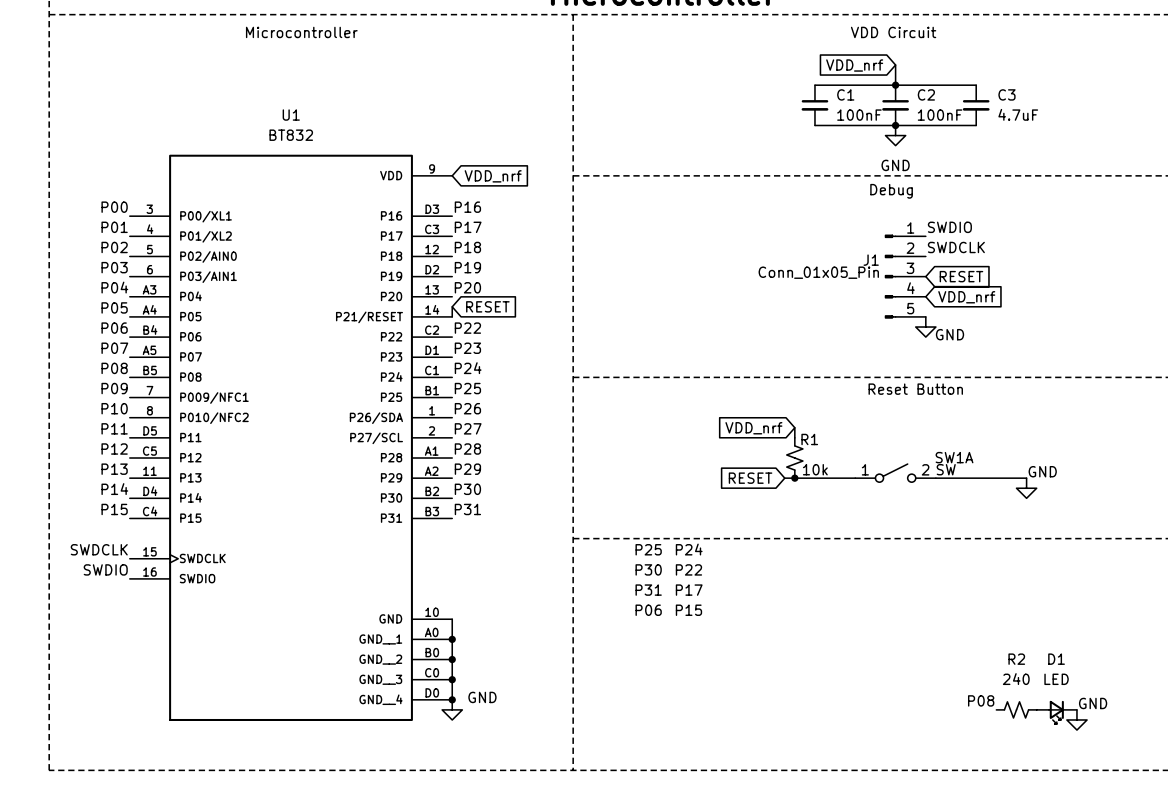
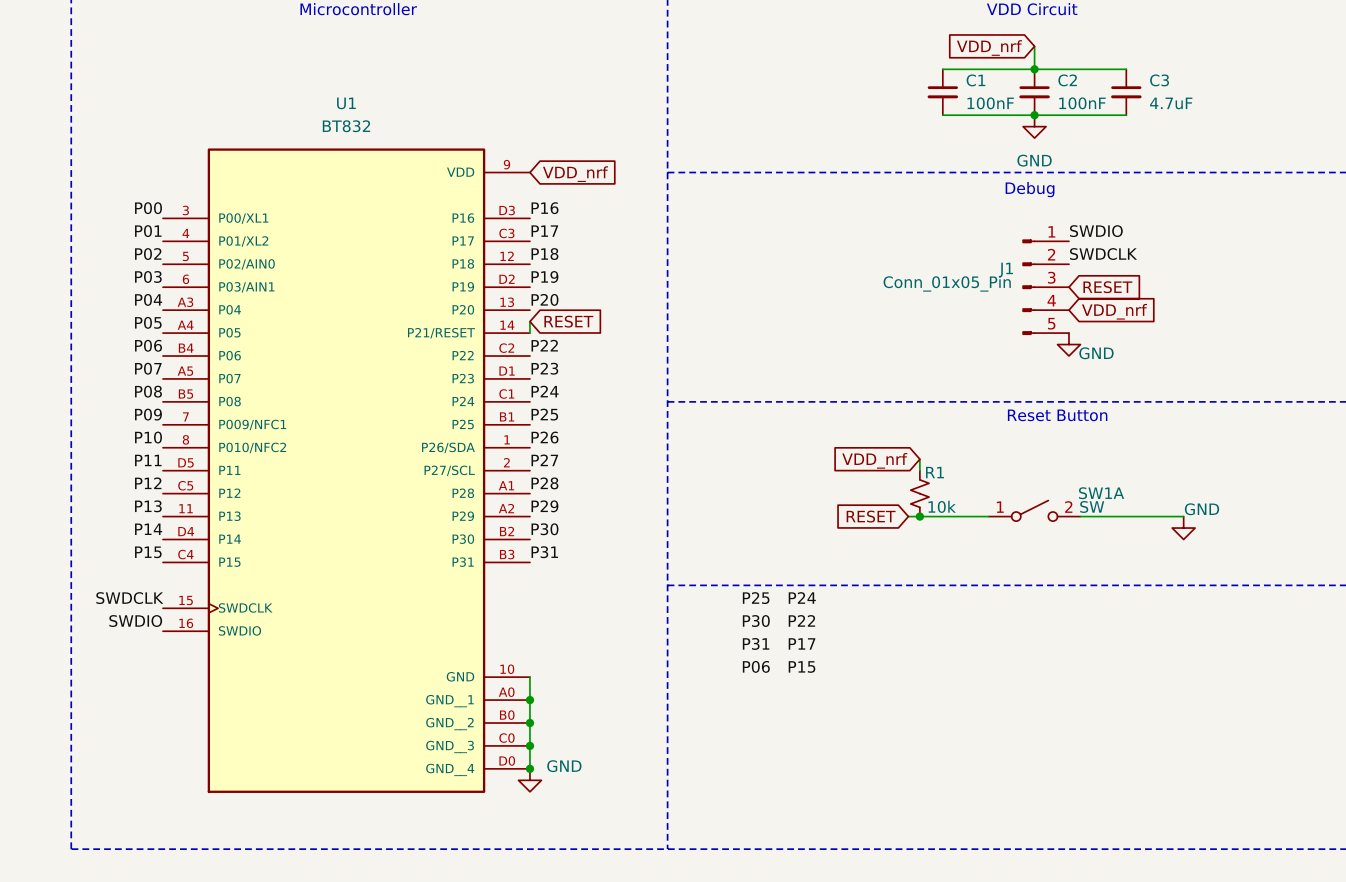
label: P08 (981, 700) -> none
R2: 240 (1016, 709) -> none
D1: LED (1056, 712) -> none
power symbol: GND (1076, 719) -> none

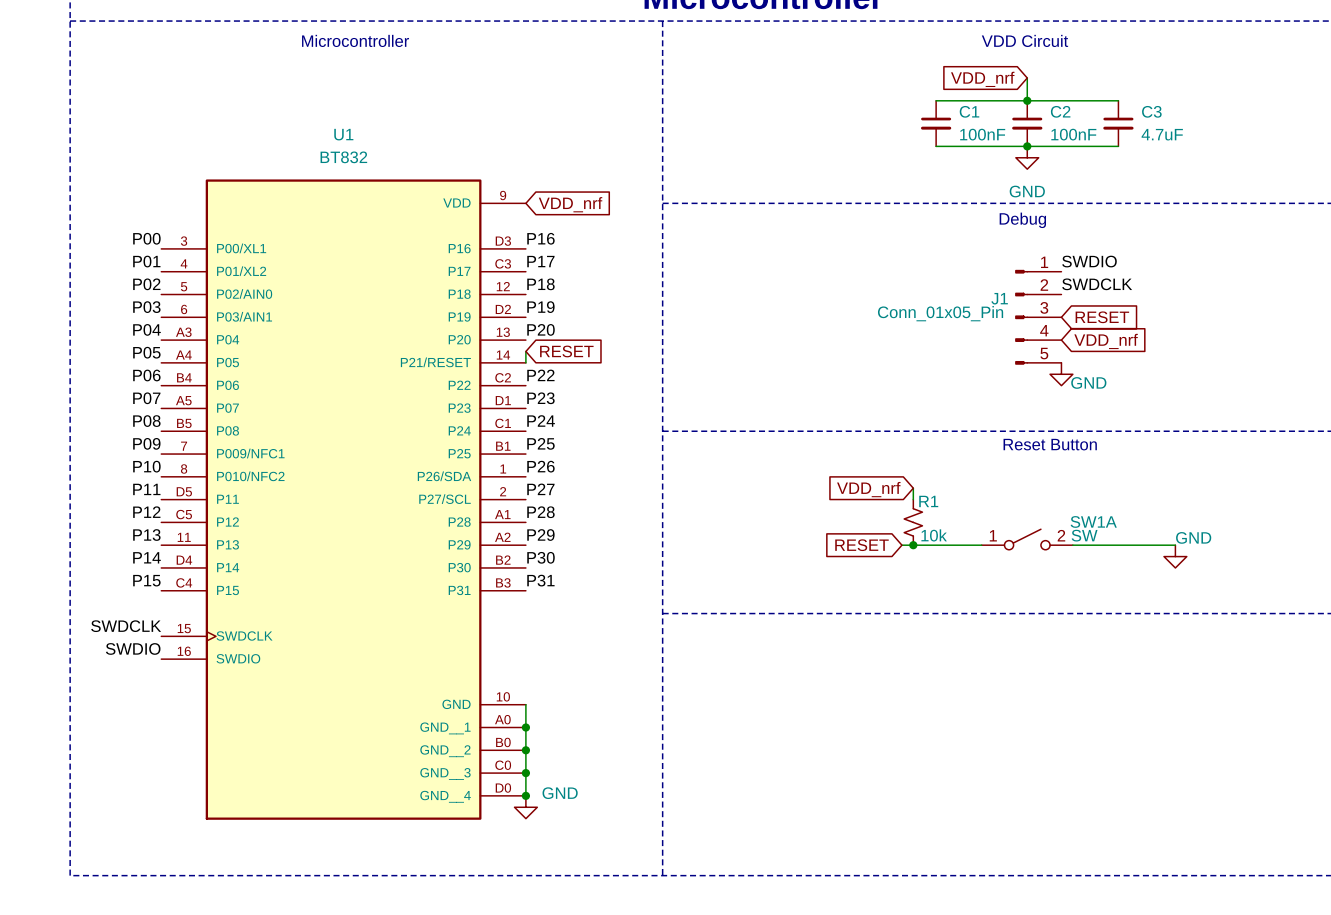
label: P24 (802, 597) -> none
label: P25 (756, 598) -> none
label: P22 (801, 620) -> none
label: P30 (756, 621) -> none
label: P31 (756, 643) -> none
label: P17 (802, 643) -> none
label: P06 (756, 666) -> none
label: P15 (802, 667) -> none

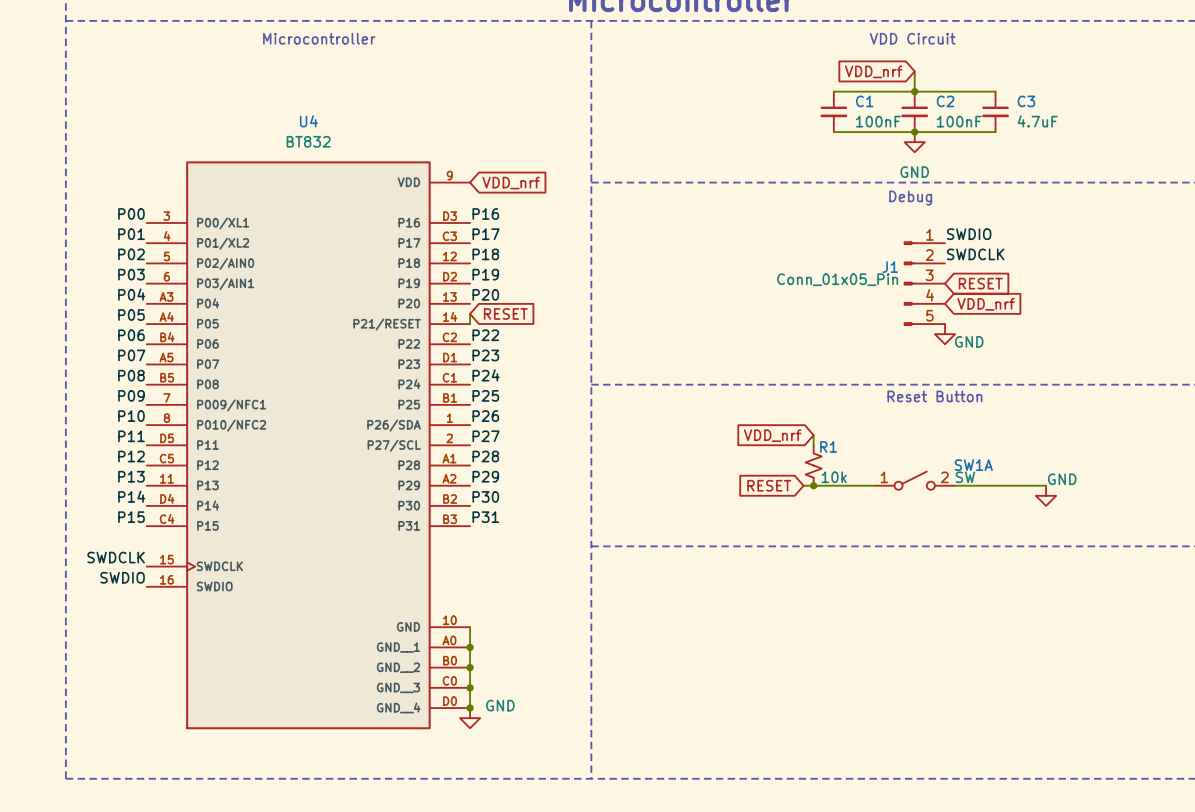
U1 name: U1 (343, 134) -> U4 (308, 121)

